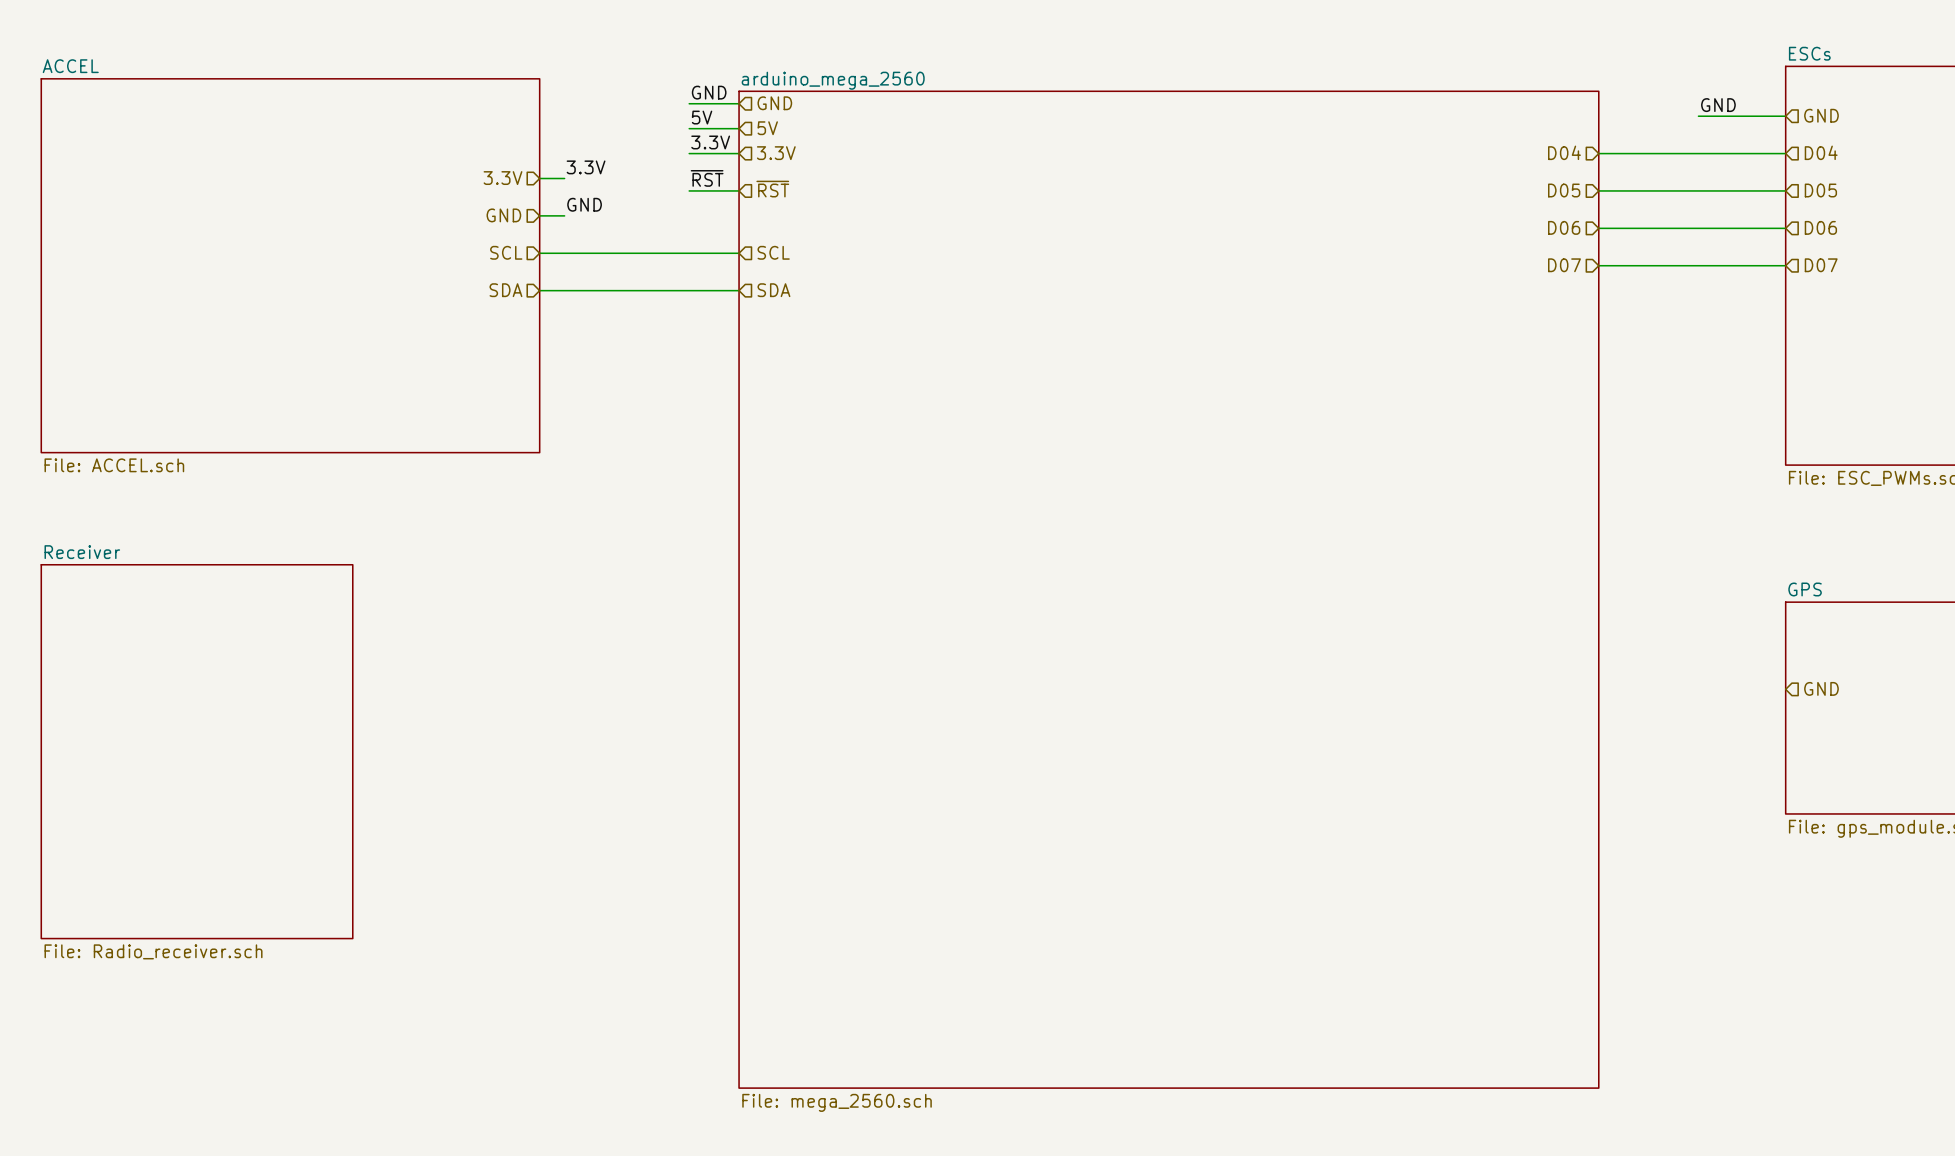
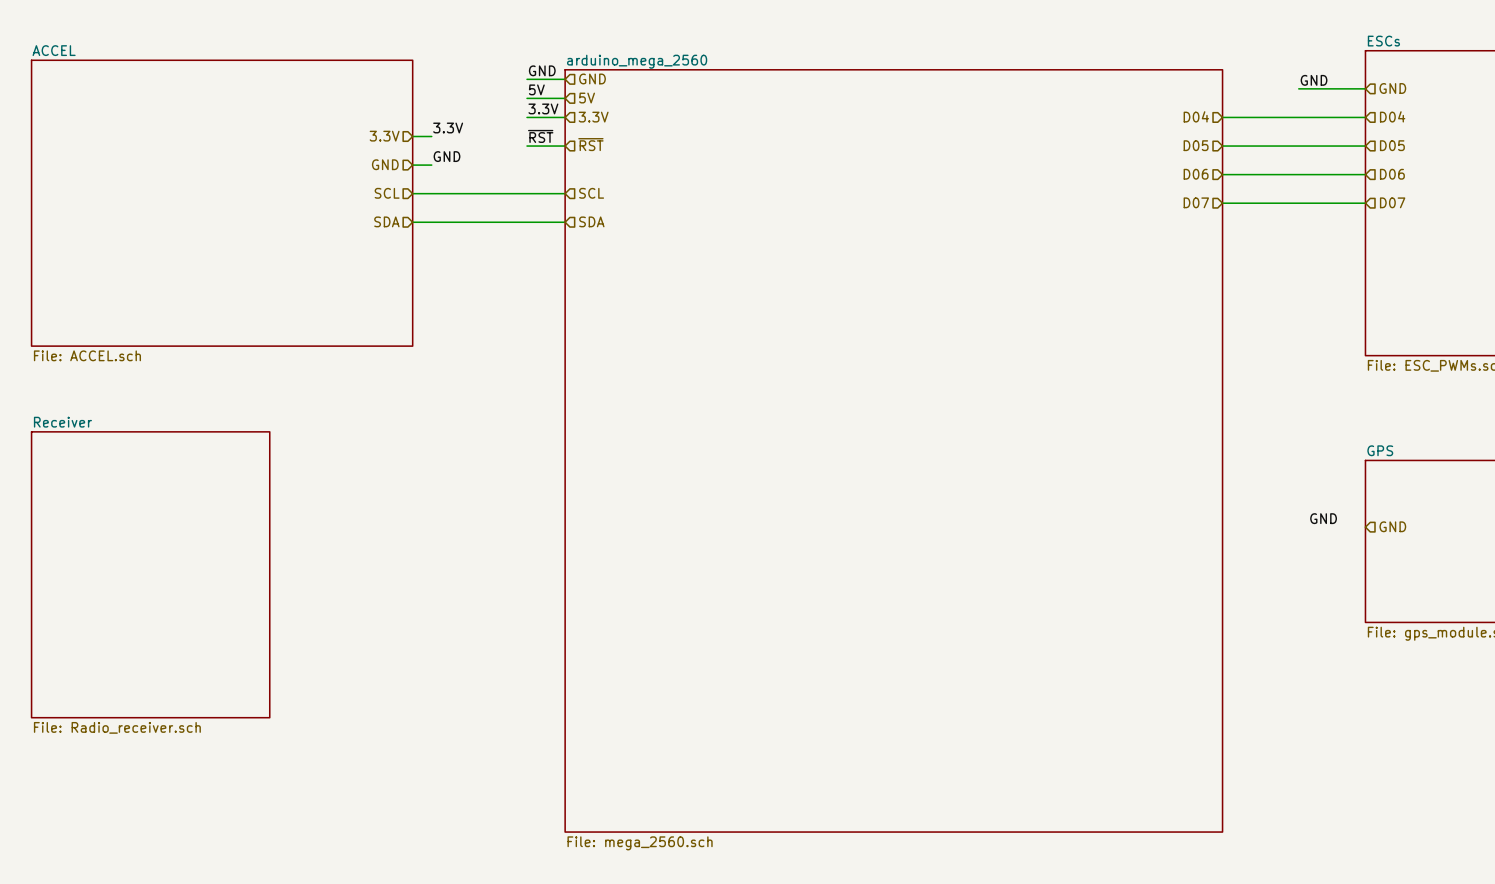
label: none -> GND (1323, 518)

